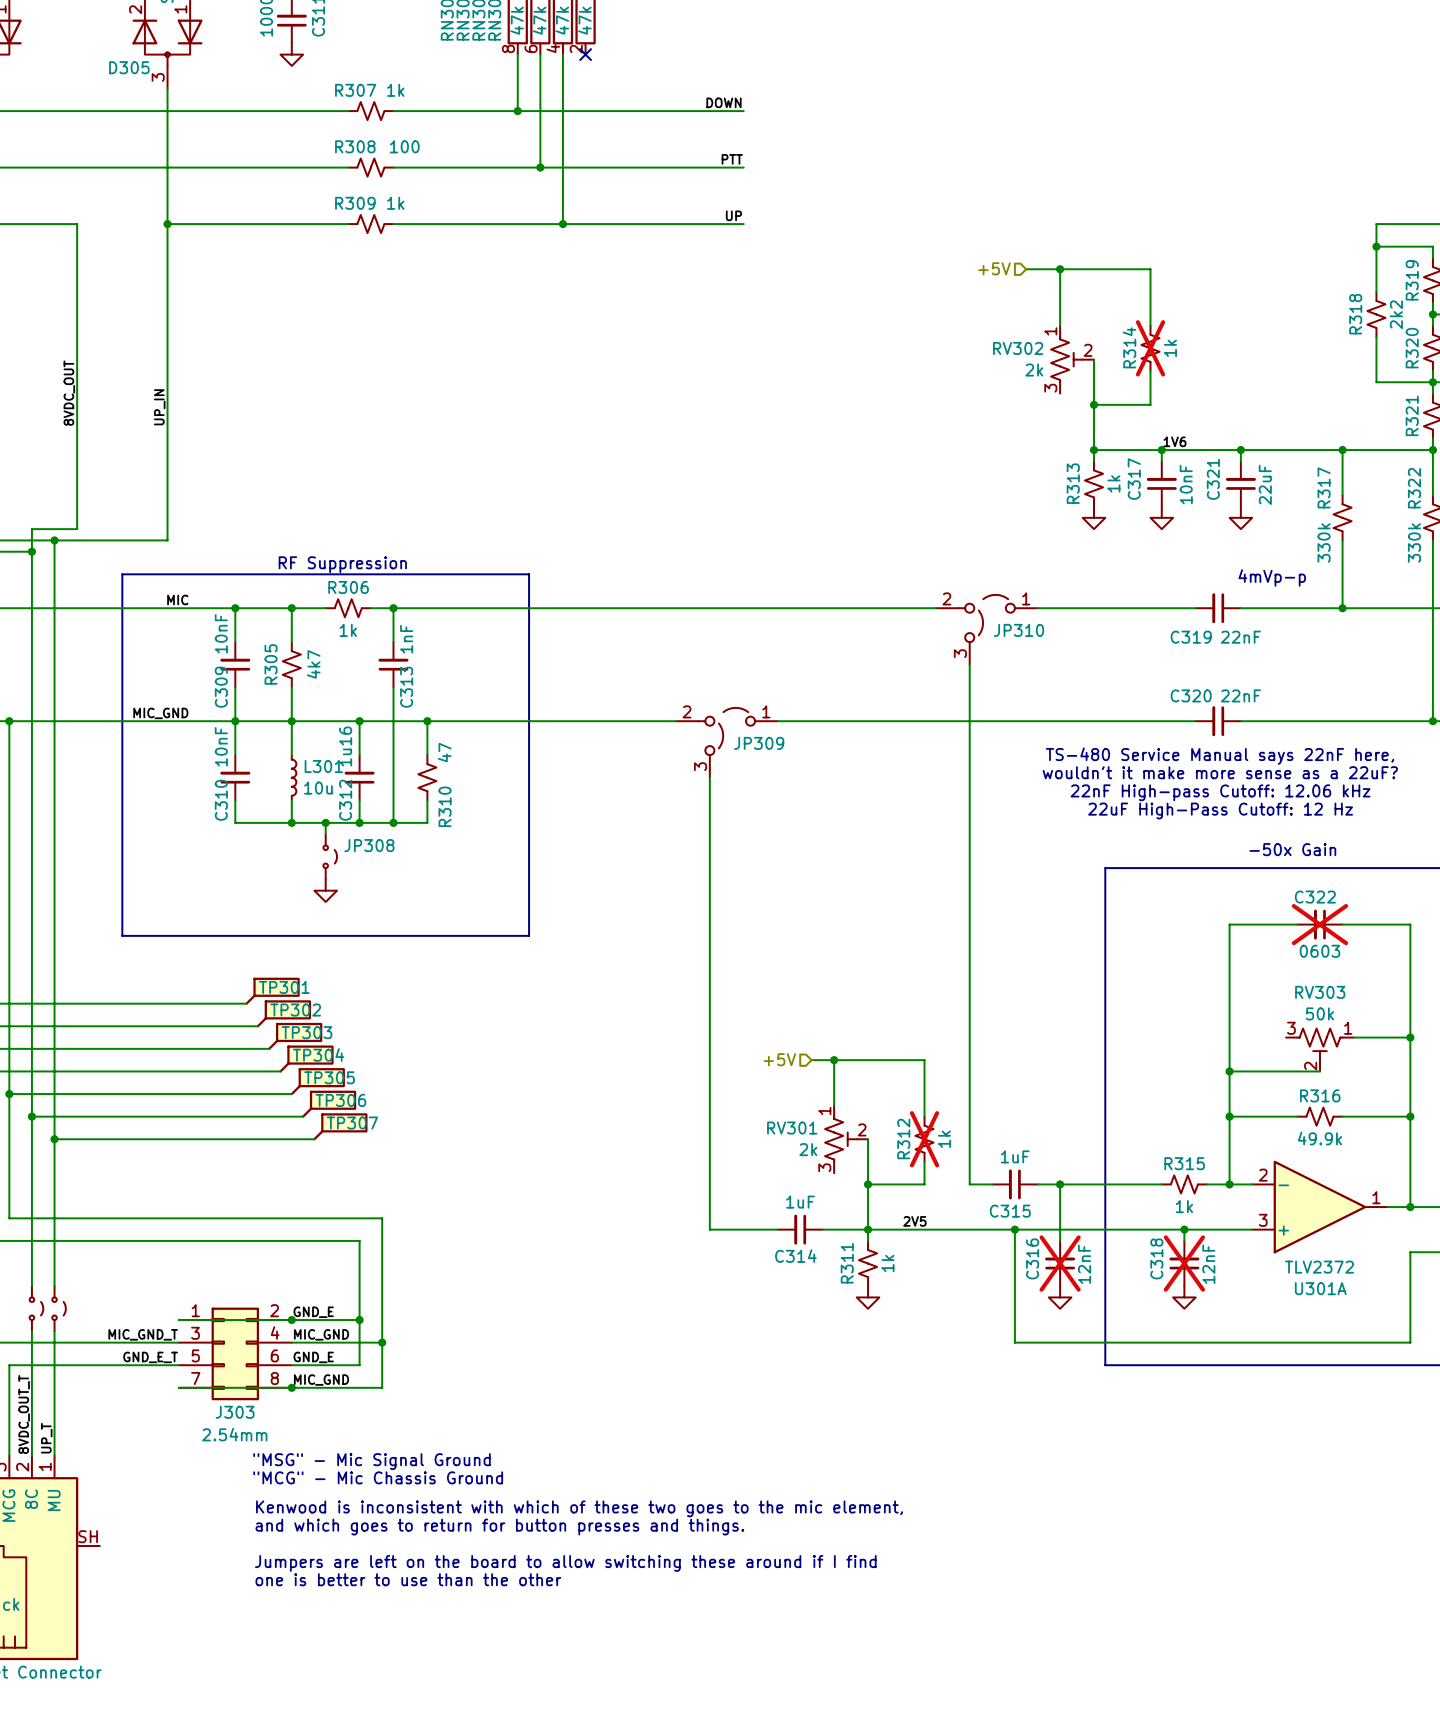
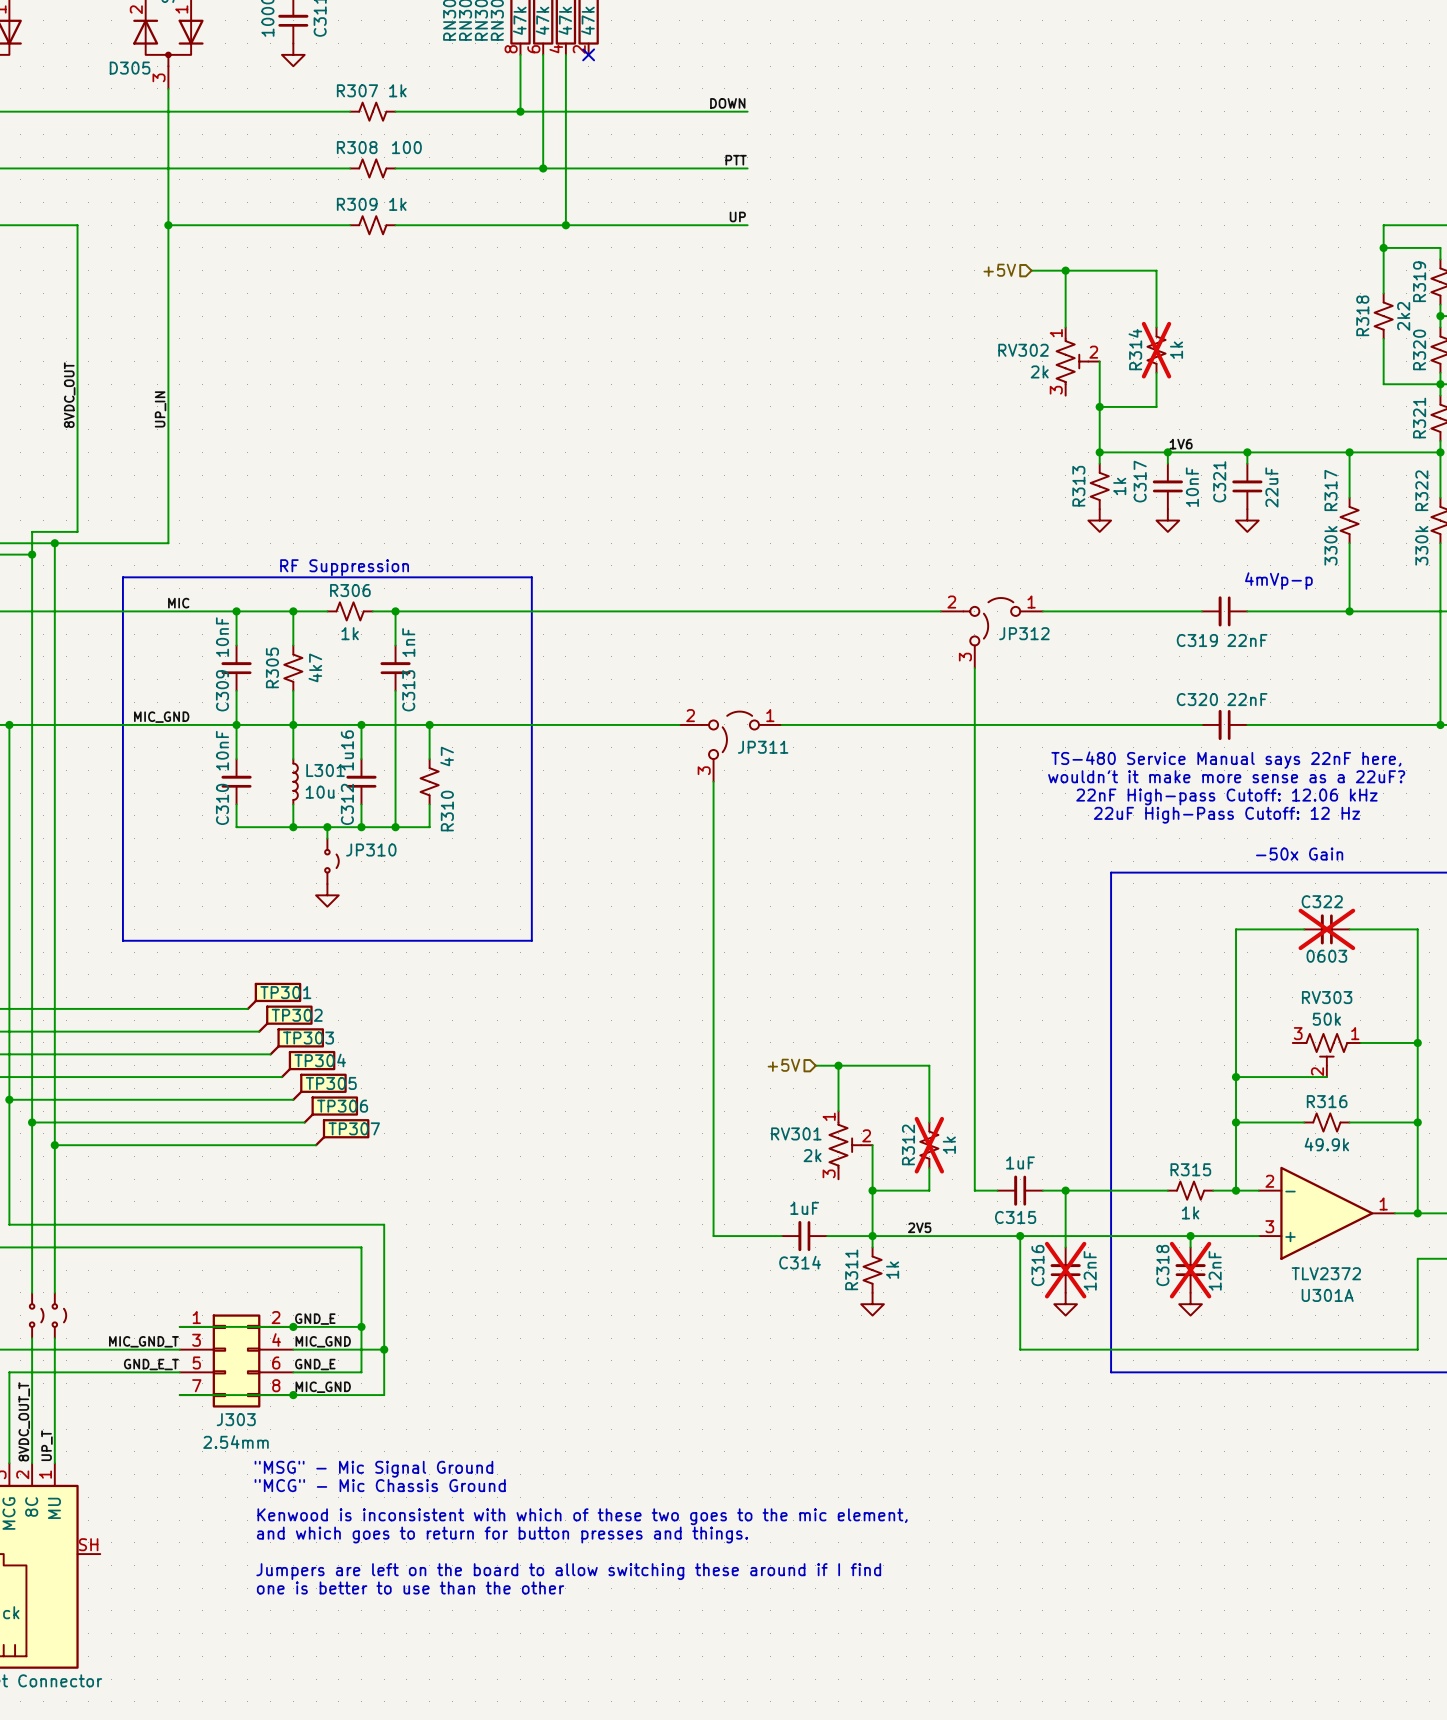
JP310 name: JP310 (1019, 630) -> JP312 (1024, 633)
JP309 name: JP309 (759, 743) -> JP311 (763, 747)
JP308 name: JP308 (369, 845) -> JP310 (371, 850)

